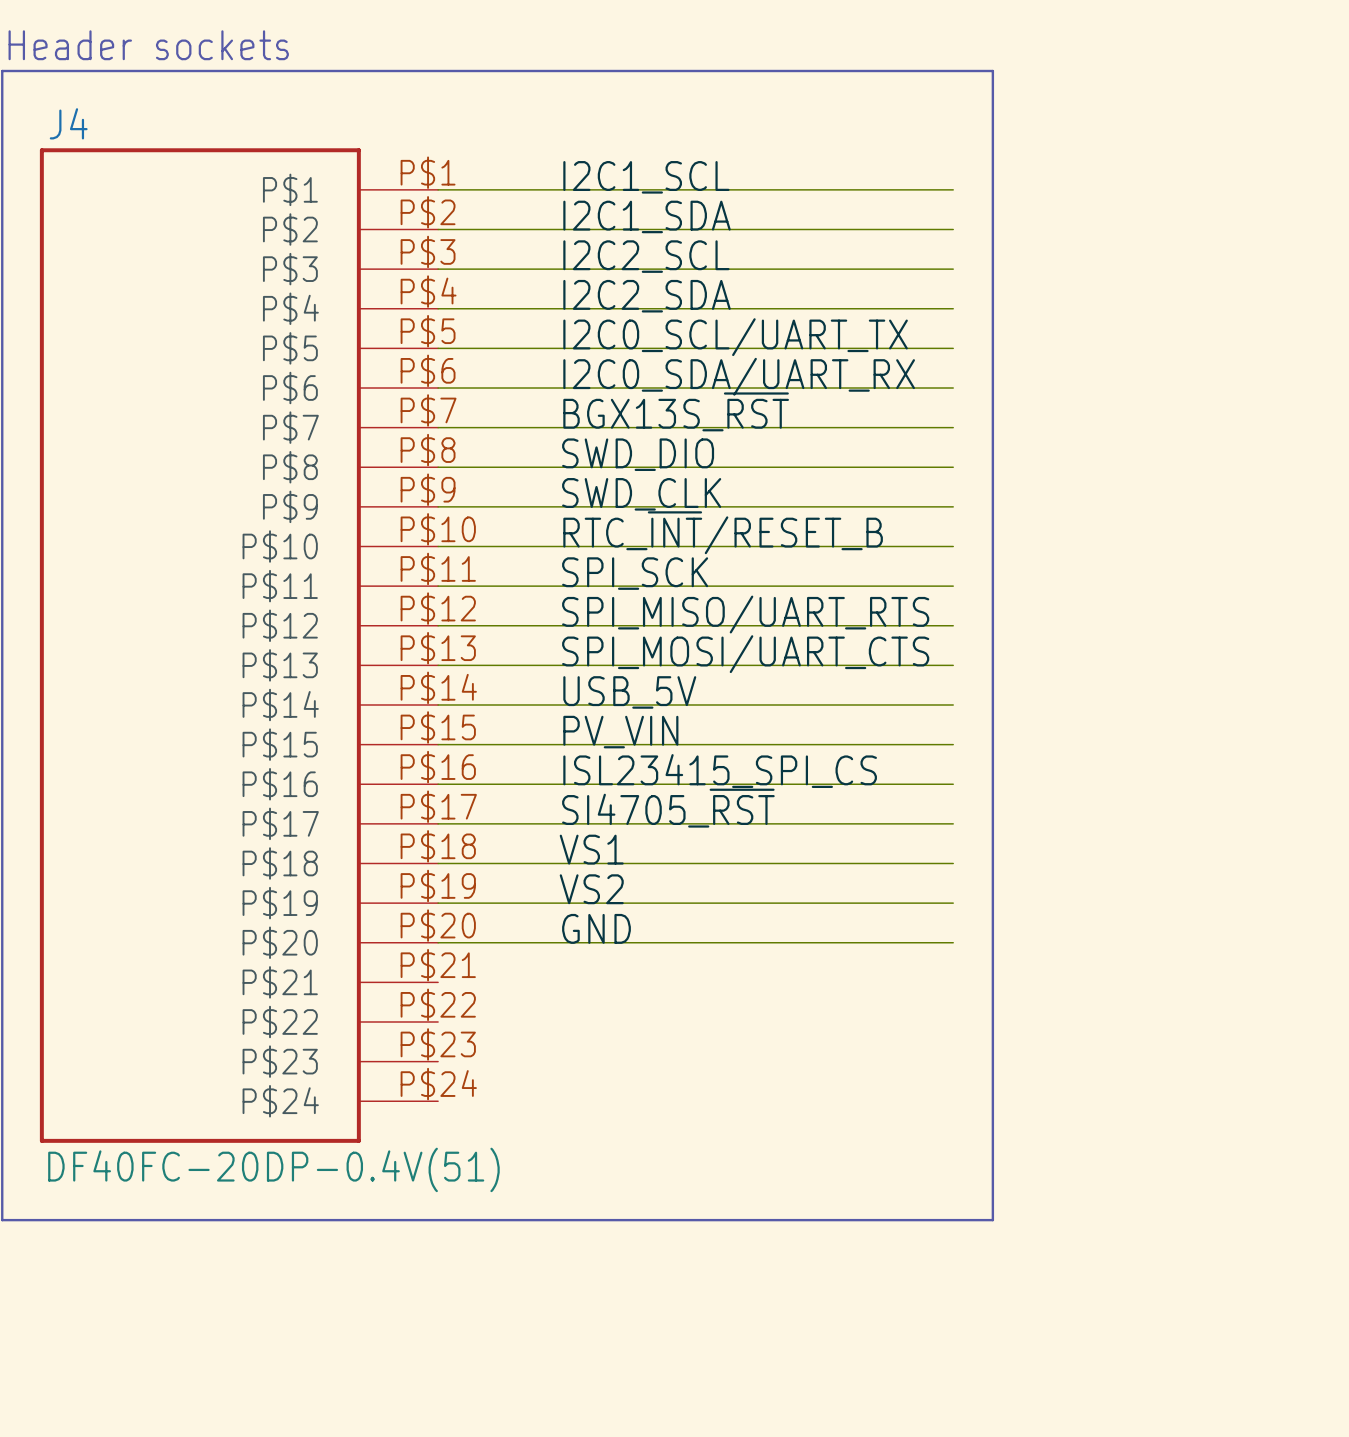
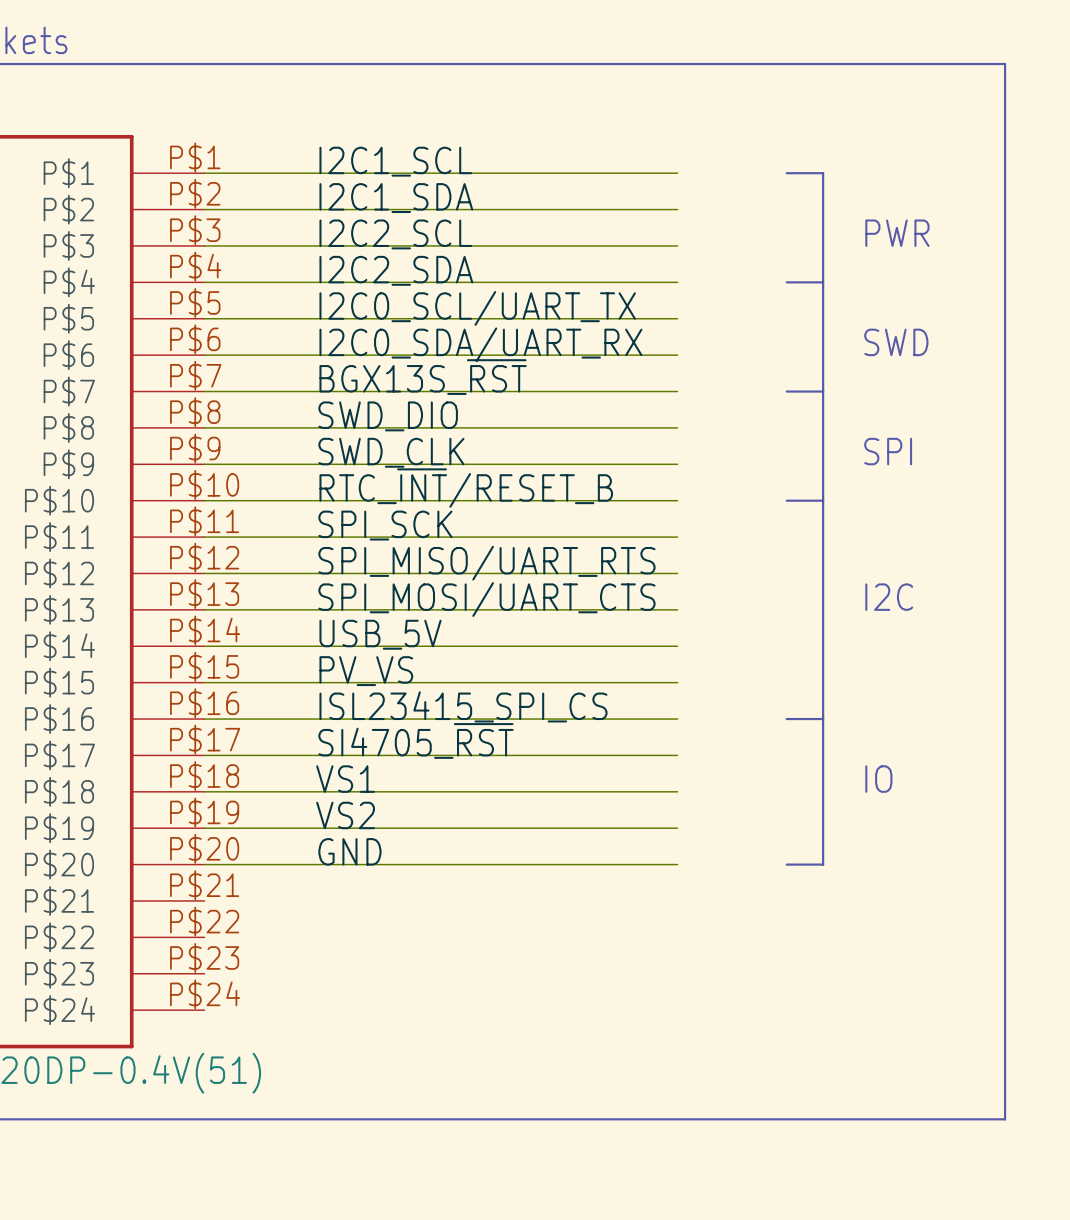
line: (992, 71) (992, 1220) -> (713, 64) (1005, 64) (1005, 1119) (713, 1119)
line: none -> (786, 173) (823, 173) (823, 864) (786, 864)
text: none -> PWR (897, 233)
line: none -> (786, 282) (823, 282)
text: none -> SWD (896, 342)
line: none -> (786, 391) (823, 391)
text: none -> SPI (888, 451)
line: none -> (786, 500) (823, 500)
text: none -> I2C (889, 597)
label: PV_VIN (620, 732) -> PV_VS (366, 671)
line: none -> (786, 719) (823, 719)
text: none -> IO (878, 779)

